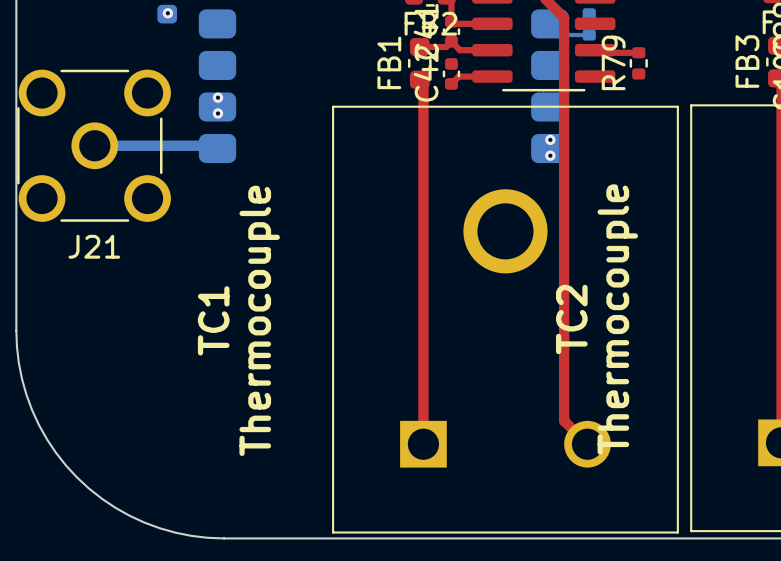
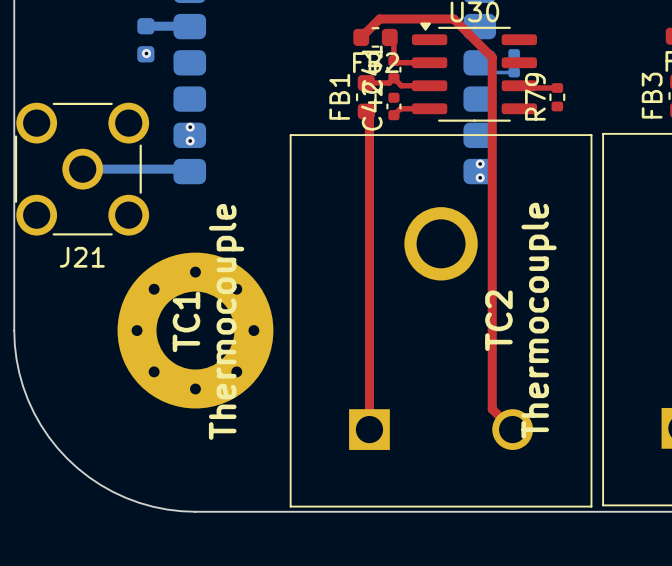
part: none -> (195, 330)

